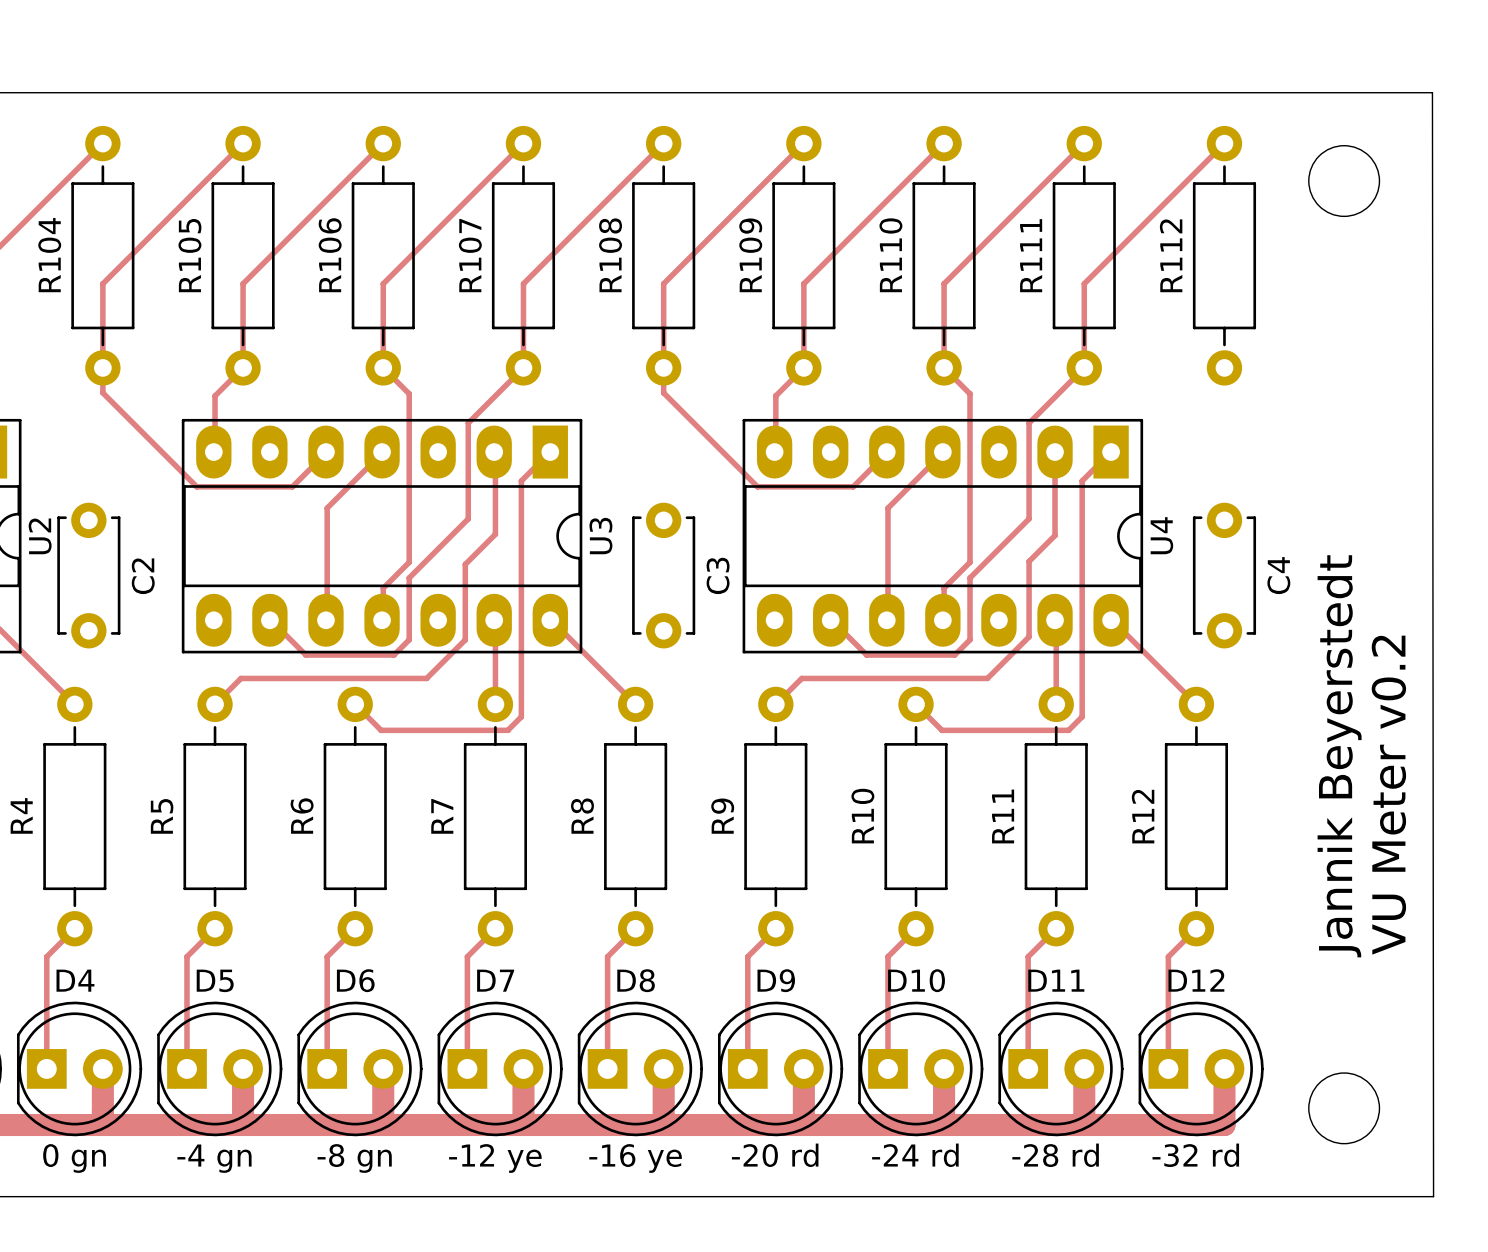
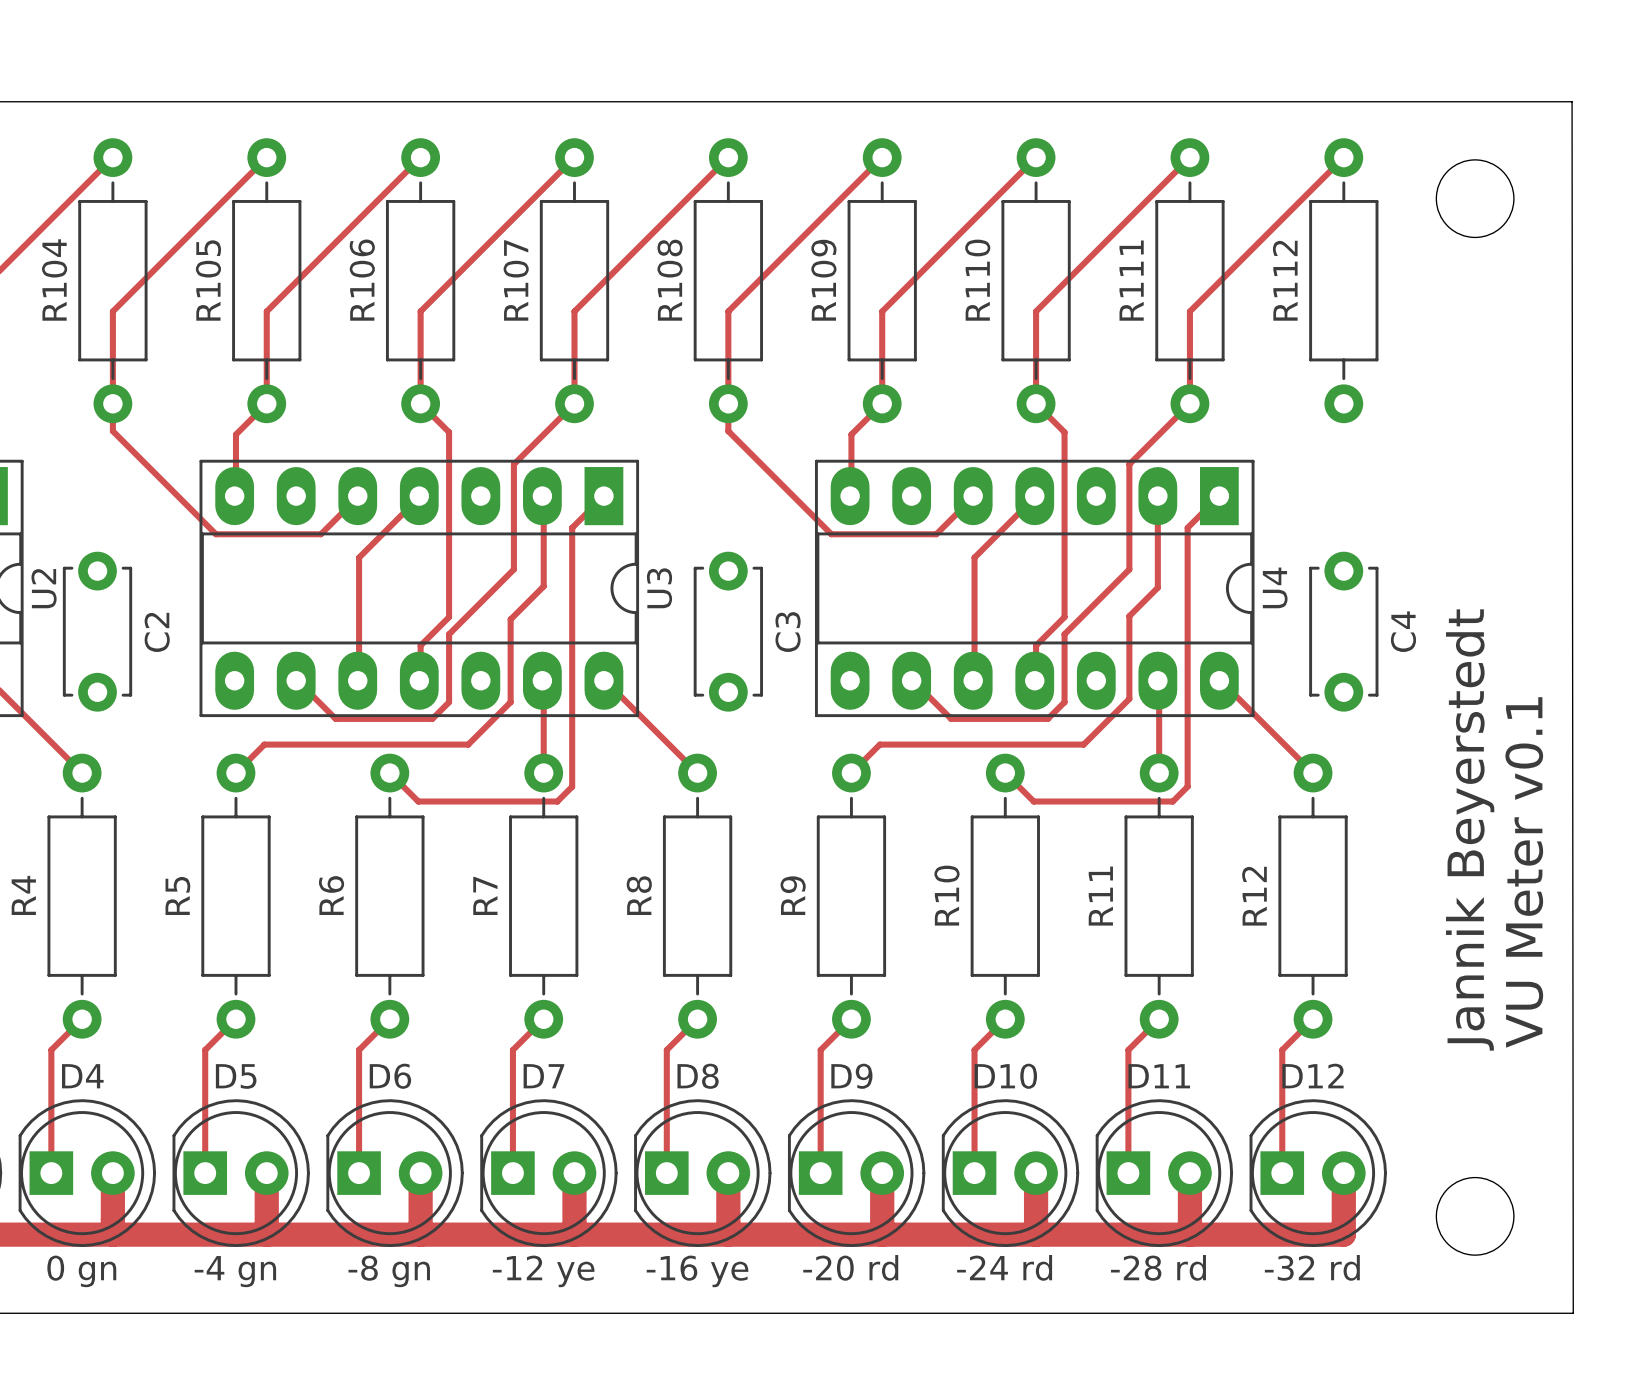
text: VU Meter v0.2 (1388, 795) -> VU Meter v0.1 (1524, 872)

